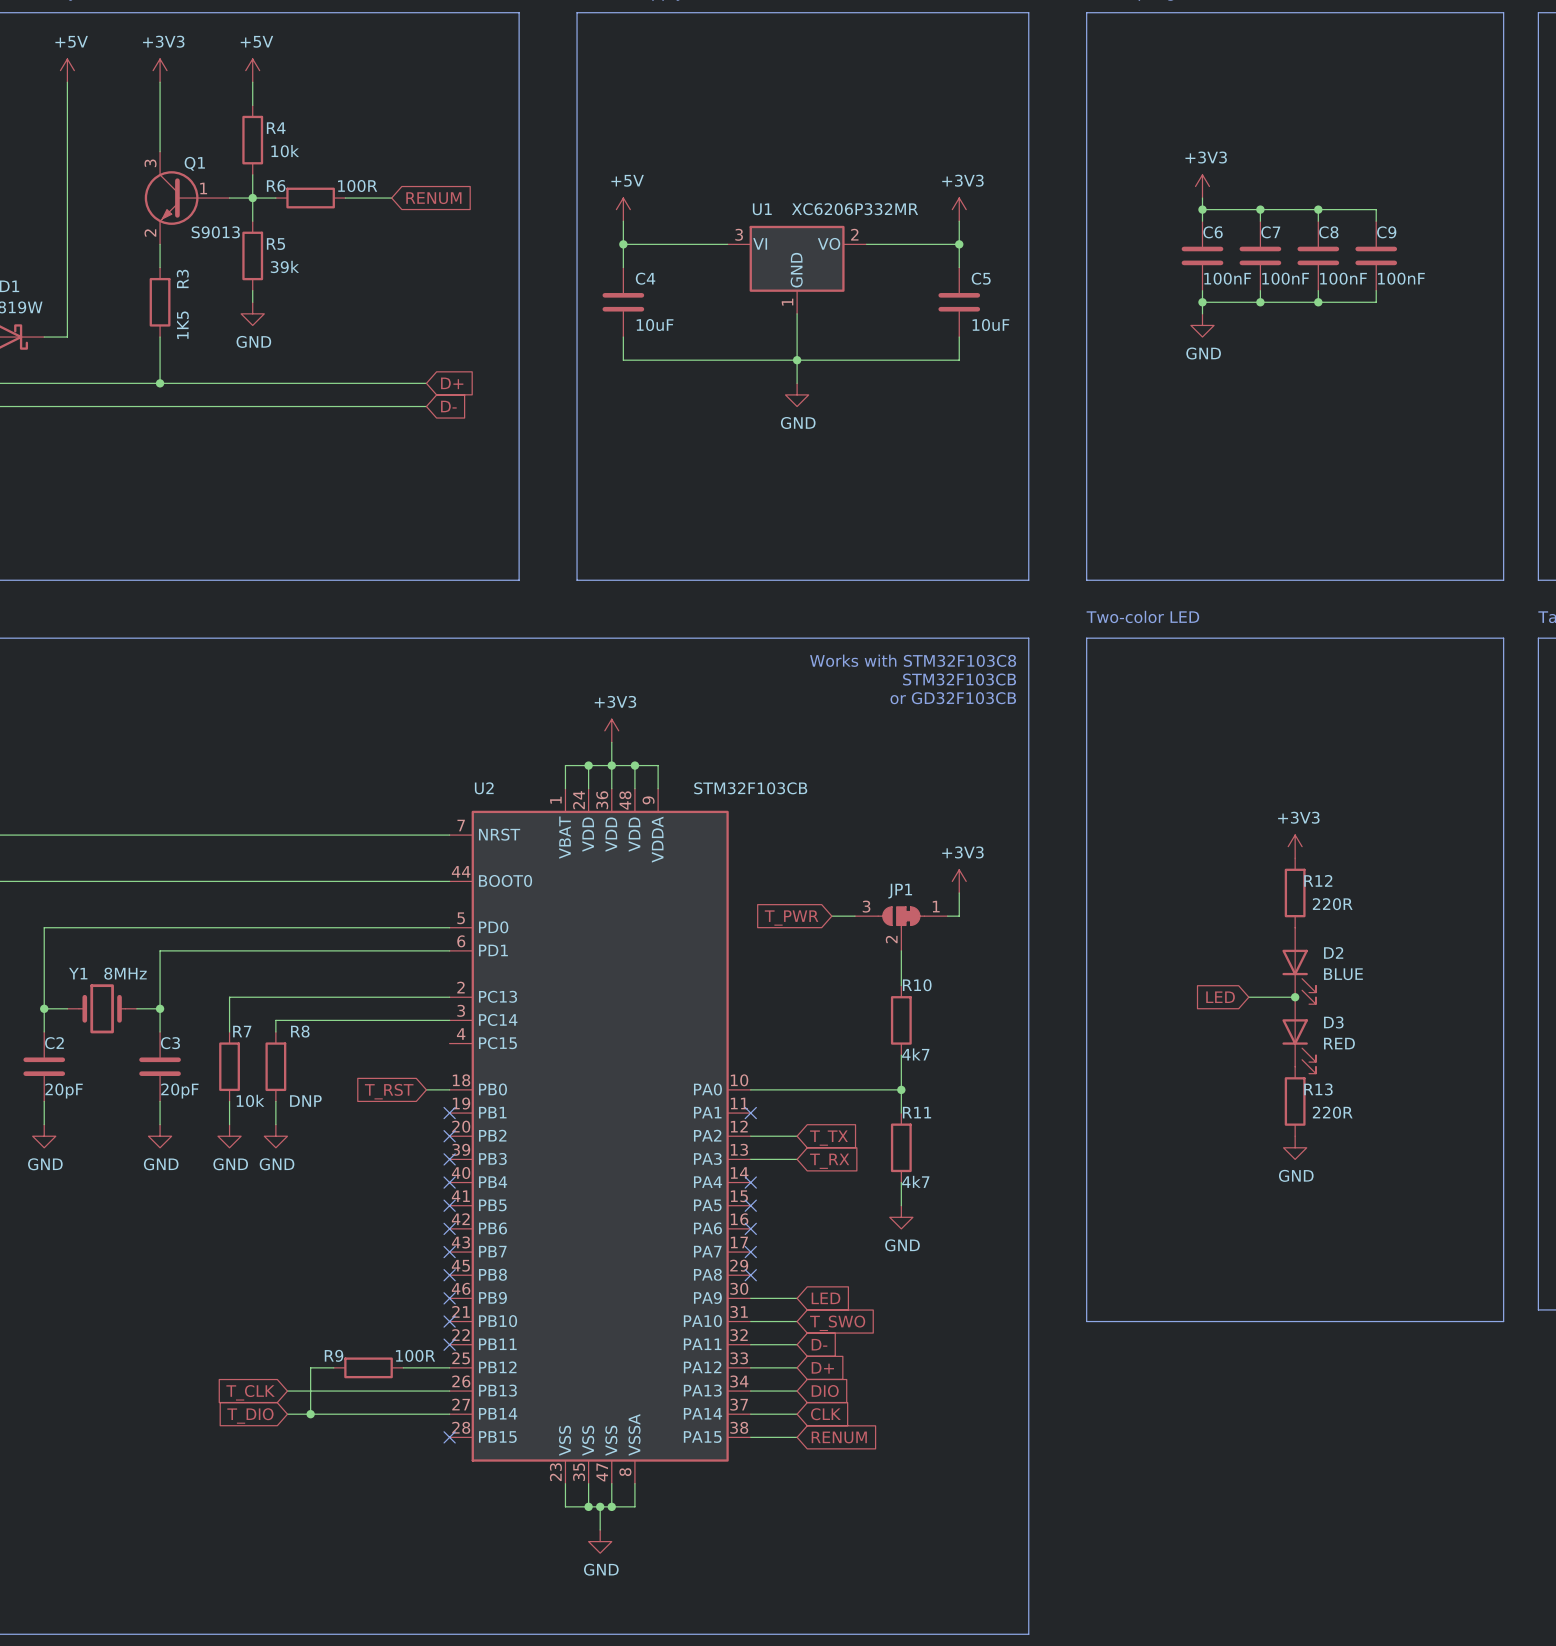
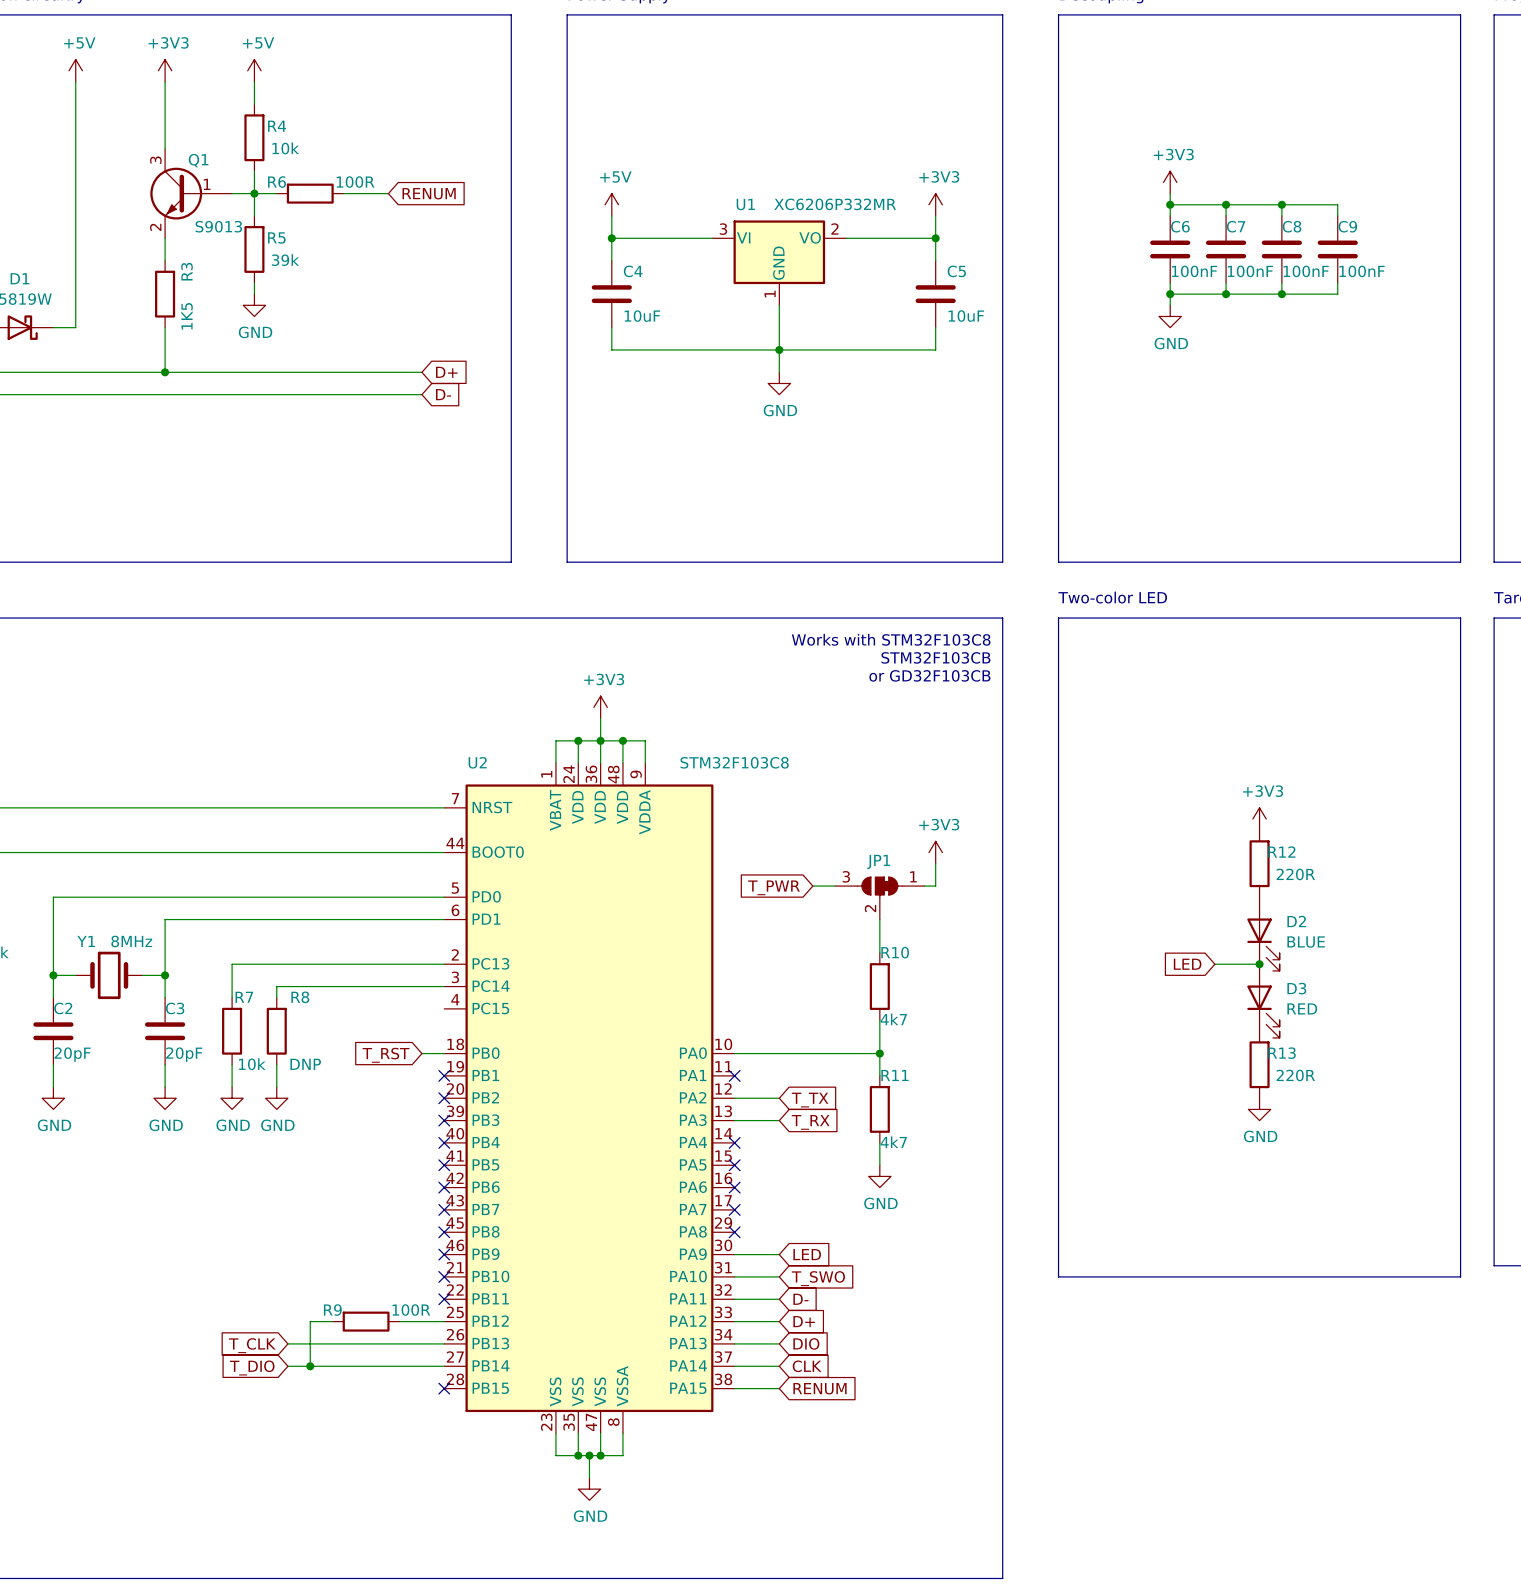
U2 value: STM32F103CB (750, 788) -> STM32F103C8 (734, 762)

